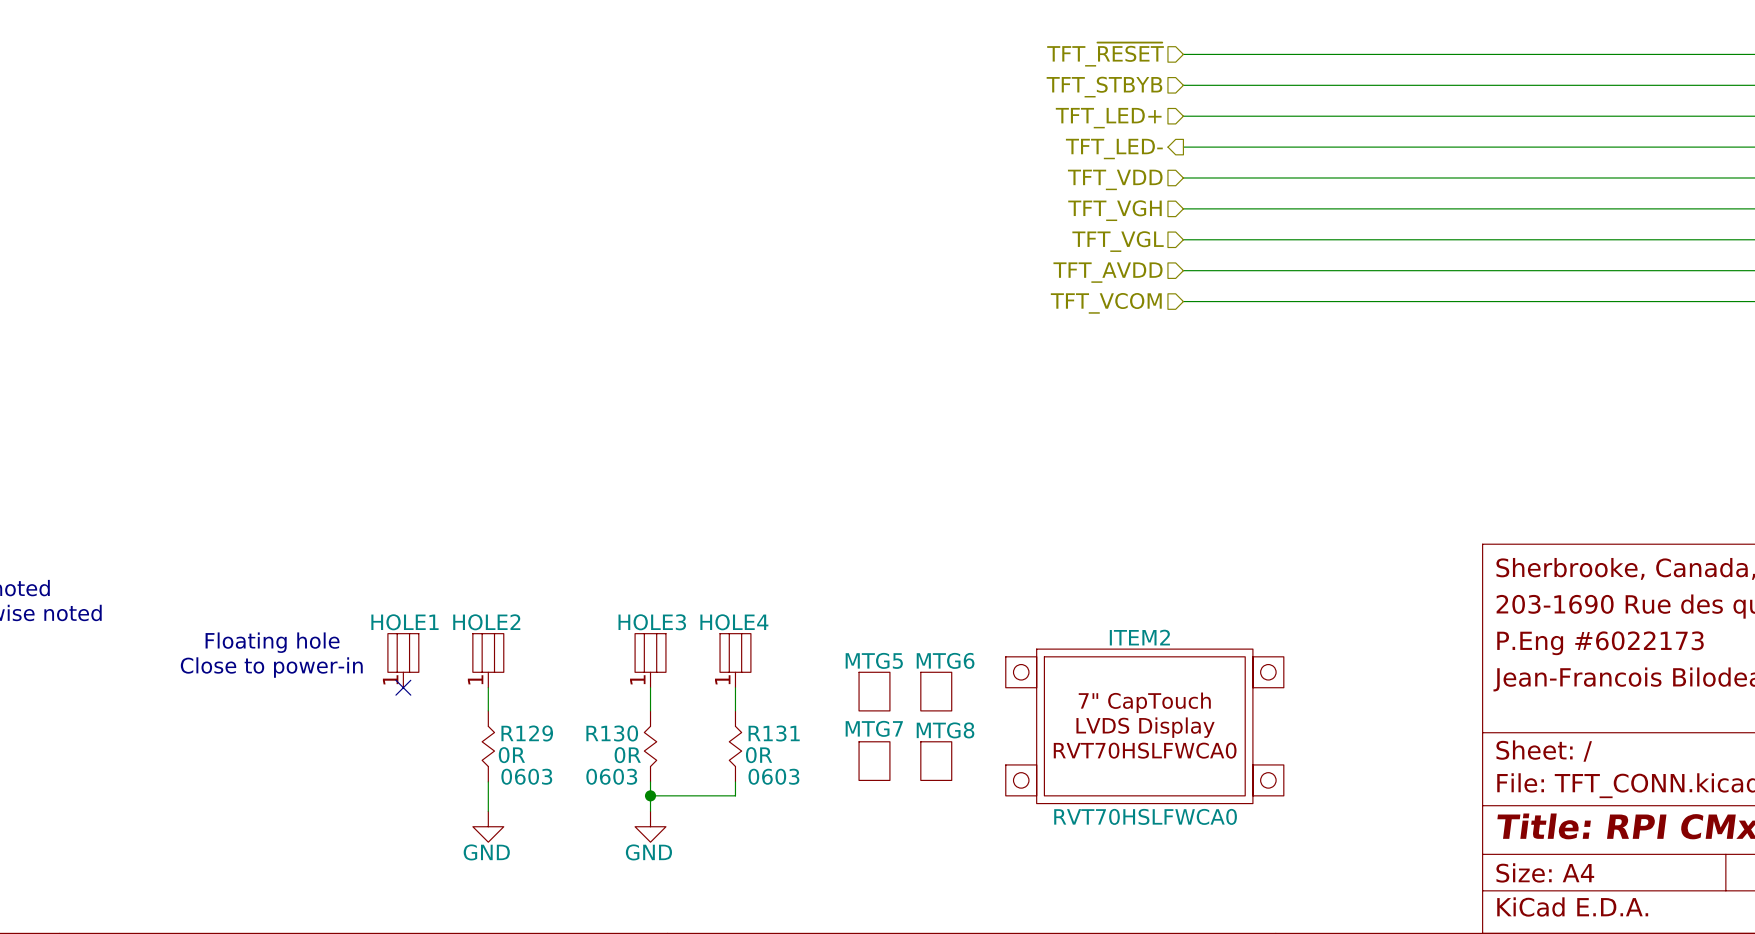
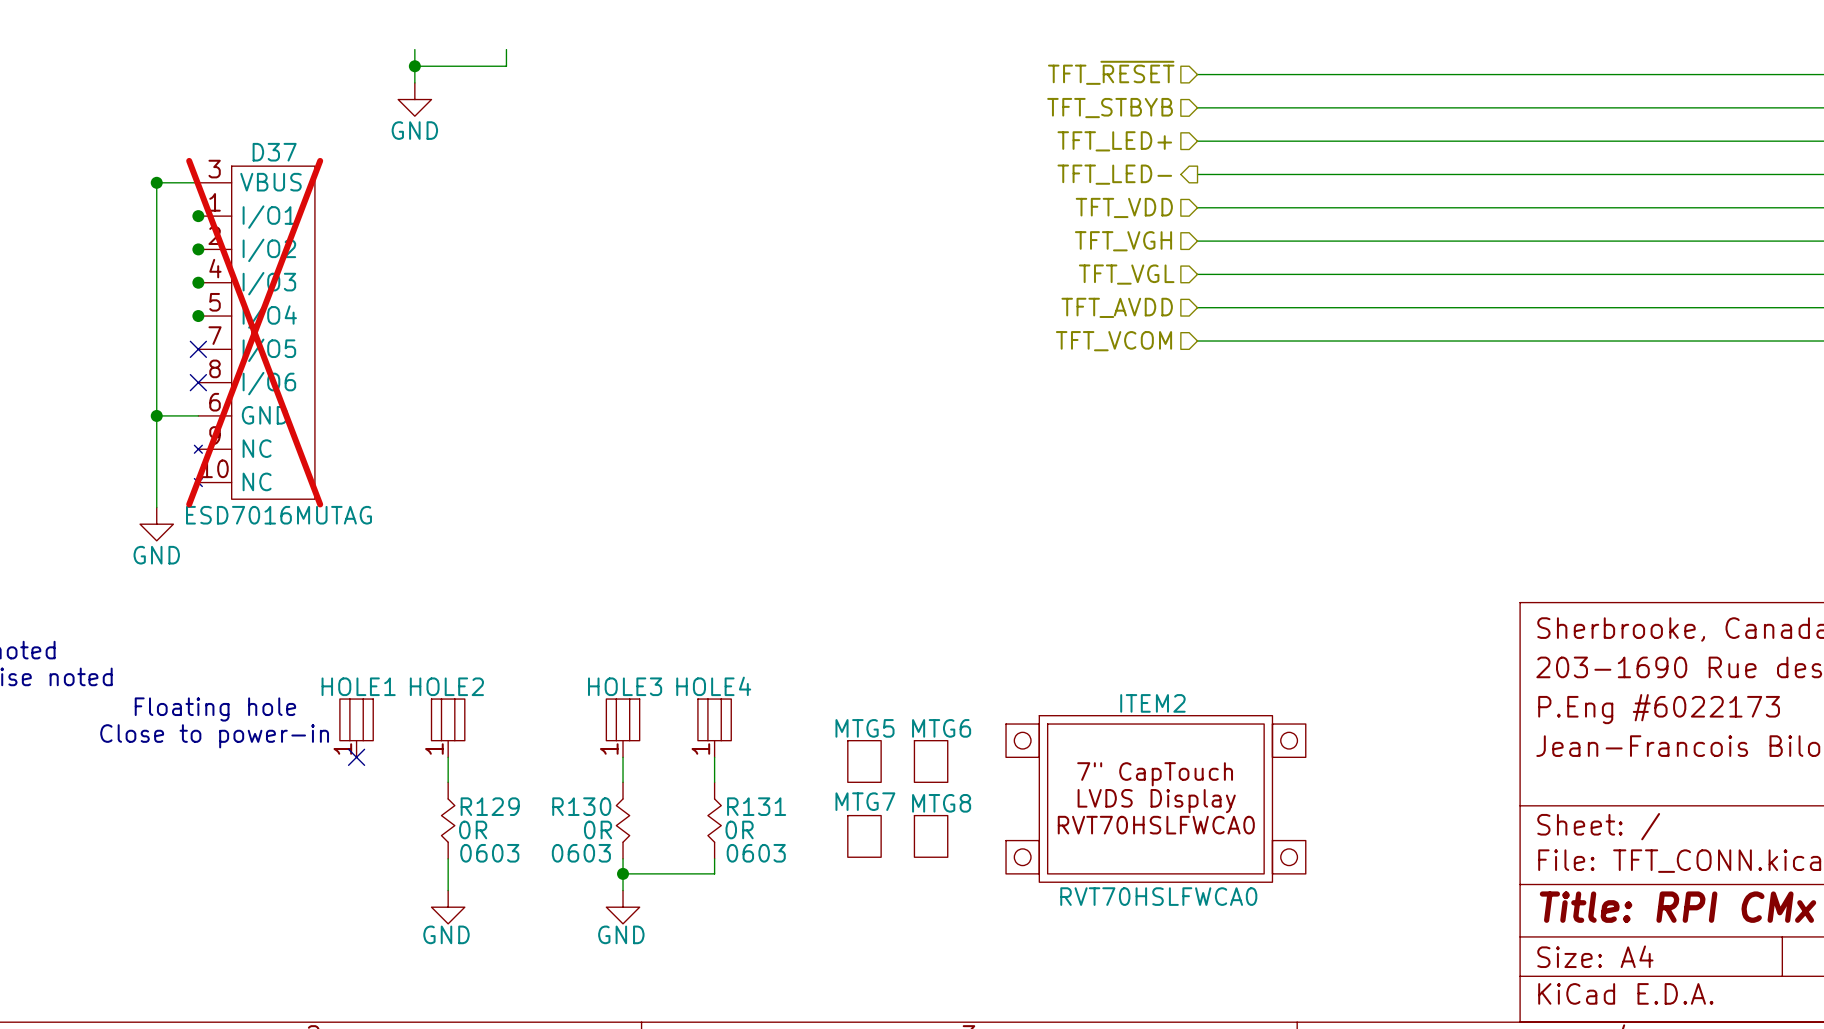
wire: none -> (414, 49) (414, 82)
wire: none -> (506, 49) (506, 66) (414, 66)
junction: none -> (414, 66)
power symbol: none -> GND (414, 99)
junction: none -> (156, 182)
wire: none -> (198, 182) (156, 182) (156, 507)
junction: none -> (198, 216)
junction: none -> (198, 249)
junction: none -> (198, 282)
junction: none -> (198, 316)
D37: none -> ESD7016MUTAG (254, 332)
no-connect mark: none -> (198, 349)
no-connect mark: none -> (198, 382)
wire: none -> (156, 415) (198, 415)
junction: none -> (156, 415)
power symbol: none -> GND (156, 524)

